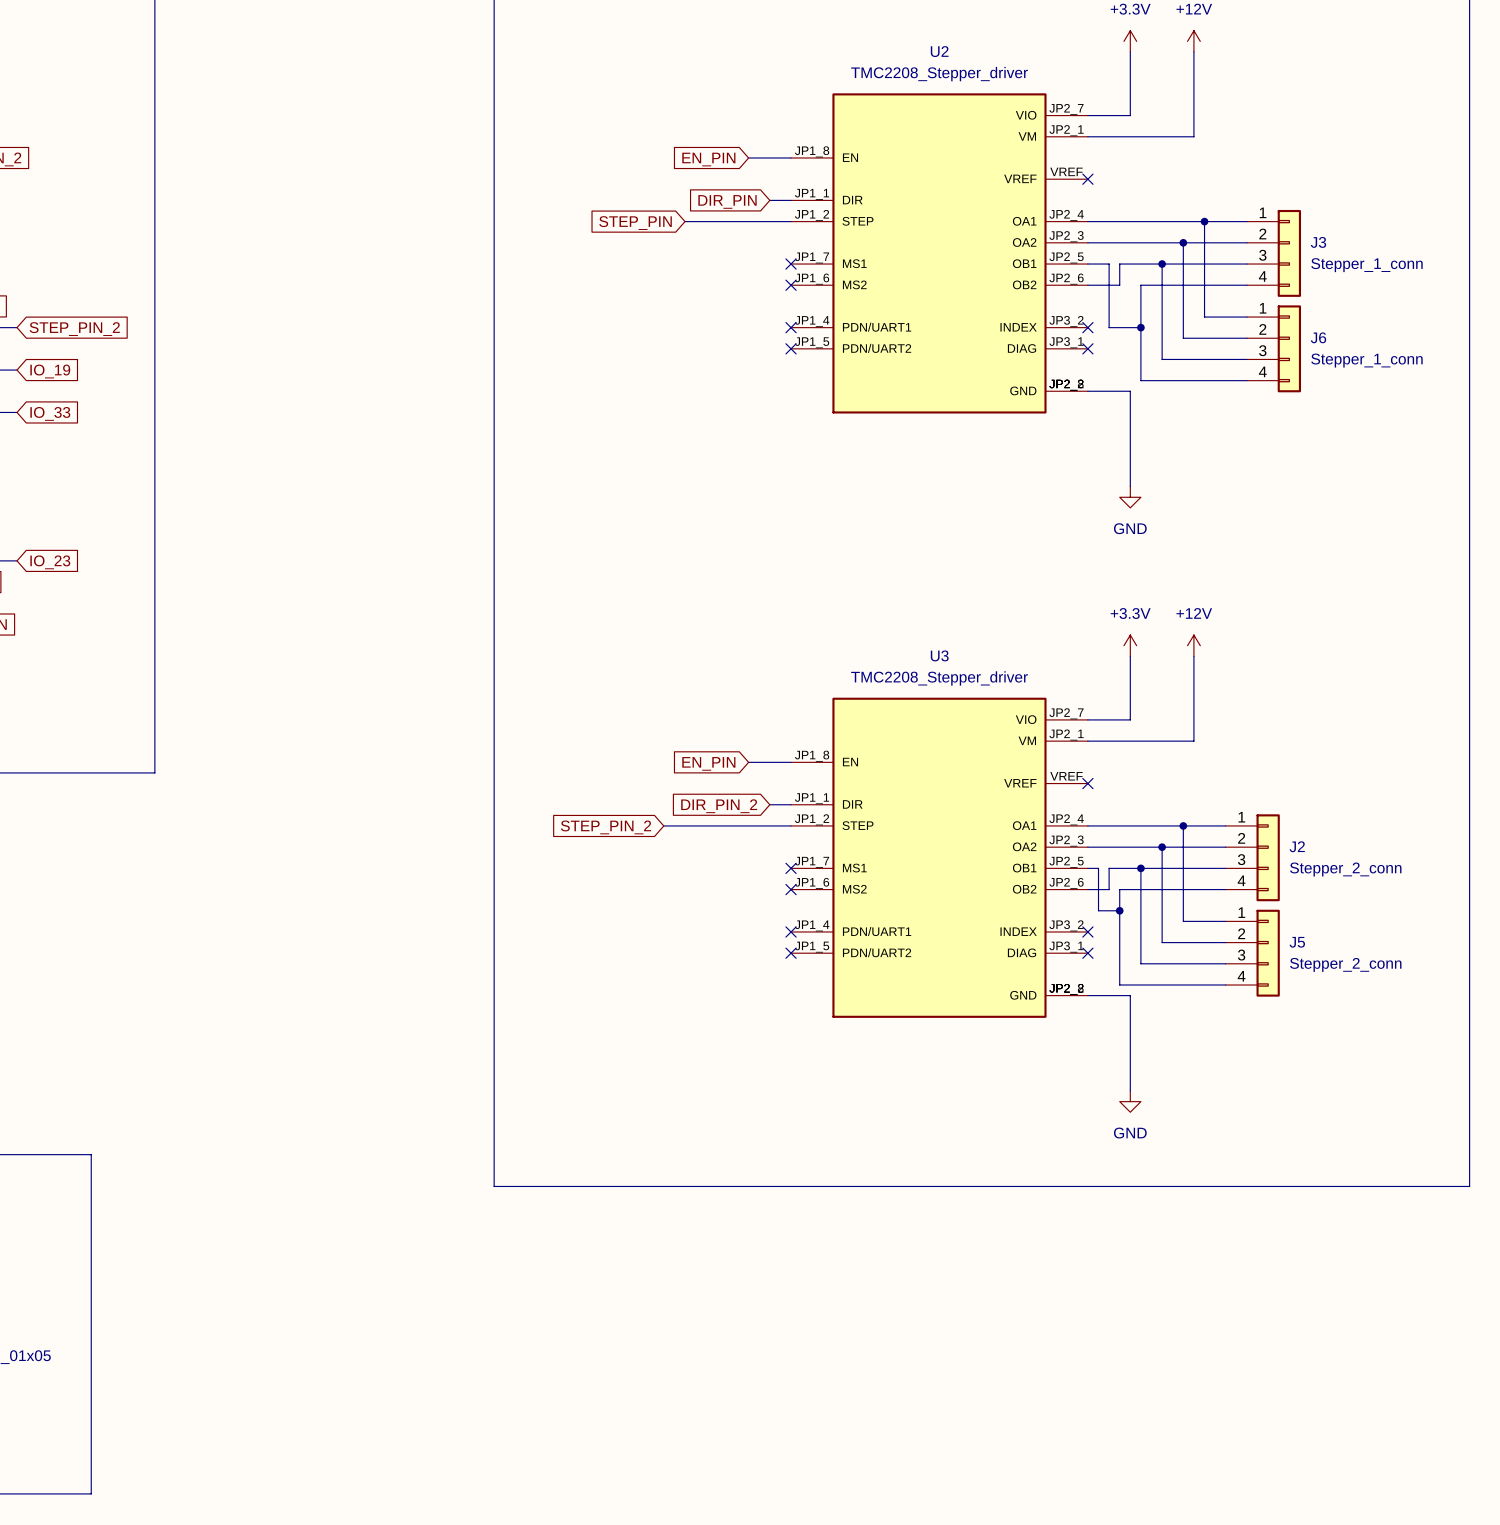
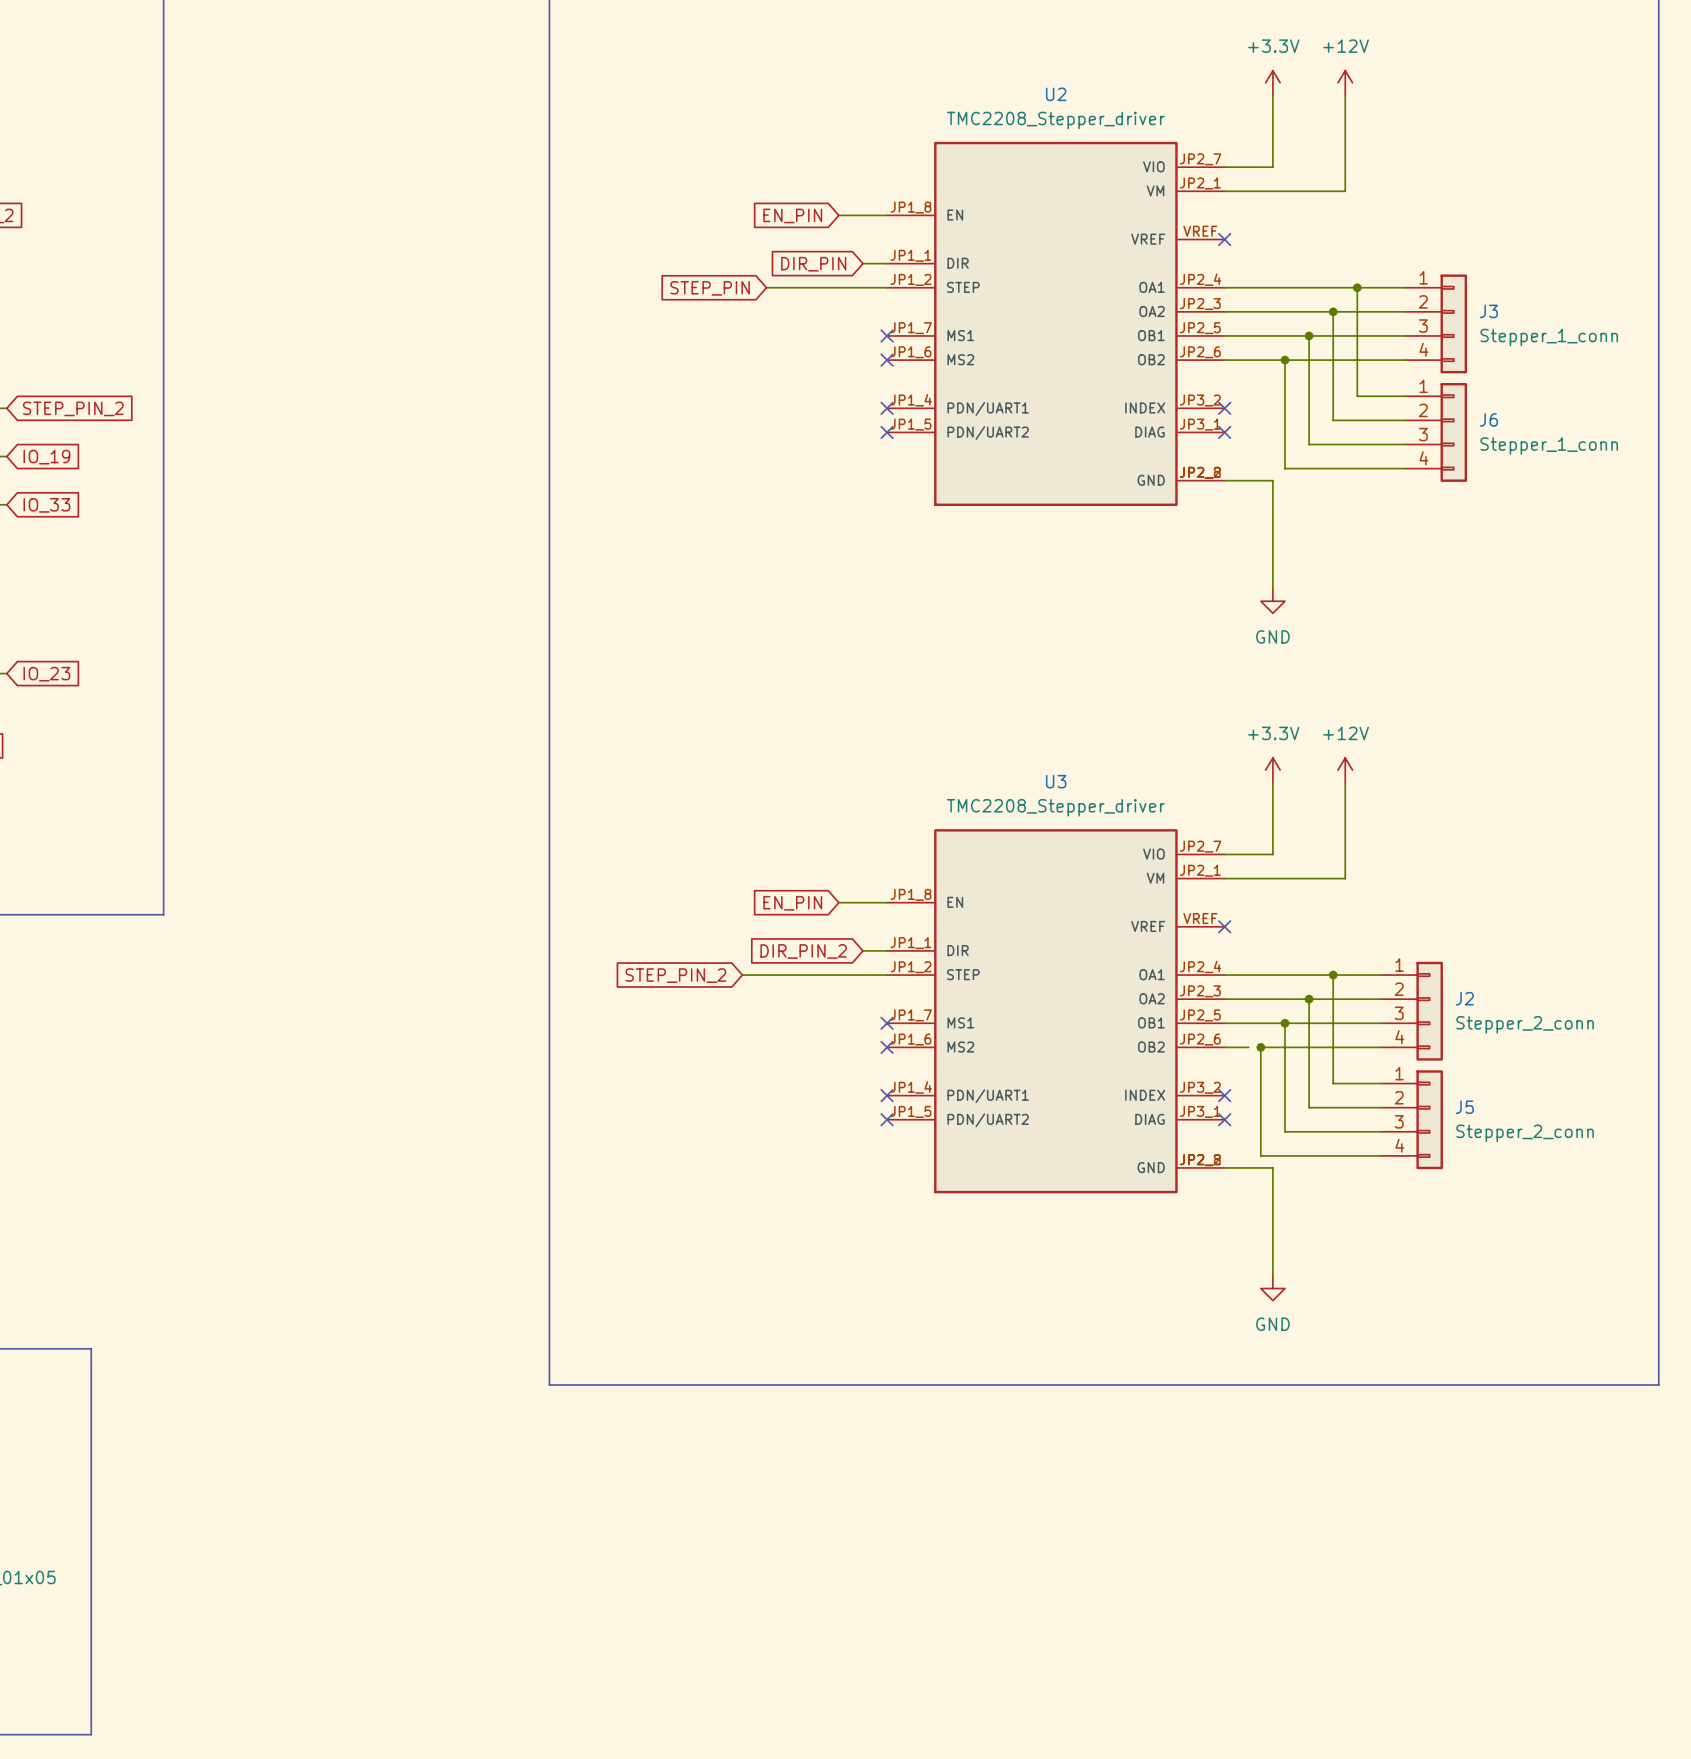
wire: (1109, 264) (1109, 327) (1140, 327) -> none
wire: (1119, 264) (1119, 285) -> (1260, 335) (1248, 335)
wire: none -> (1260, 360) (1284, 360)
junction position: (1140, 327) -> (1284, 360)
wire: (1098, 868) (1098, 910) (1119, 910) -> none
wire: (1109, 868) (1109, 889) -> (1248, 1023) (1236, 1023)
junction position: (1119, 910) -> (1260, 1047)

